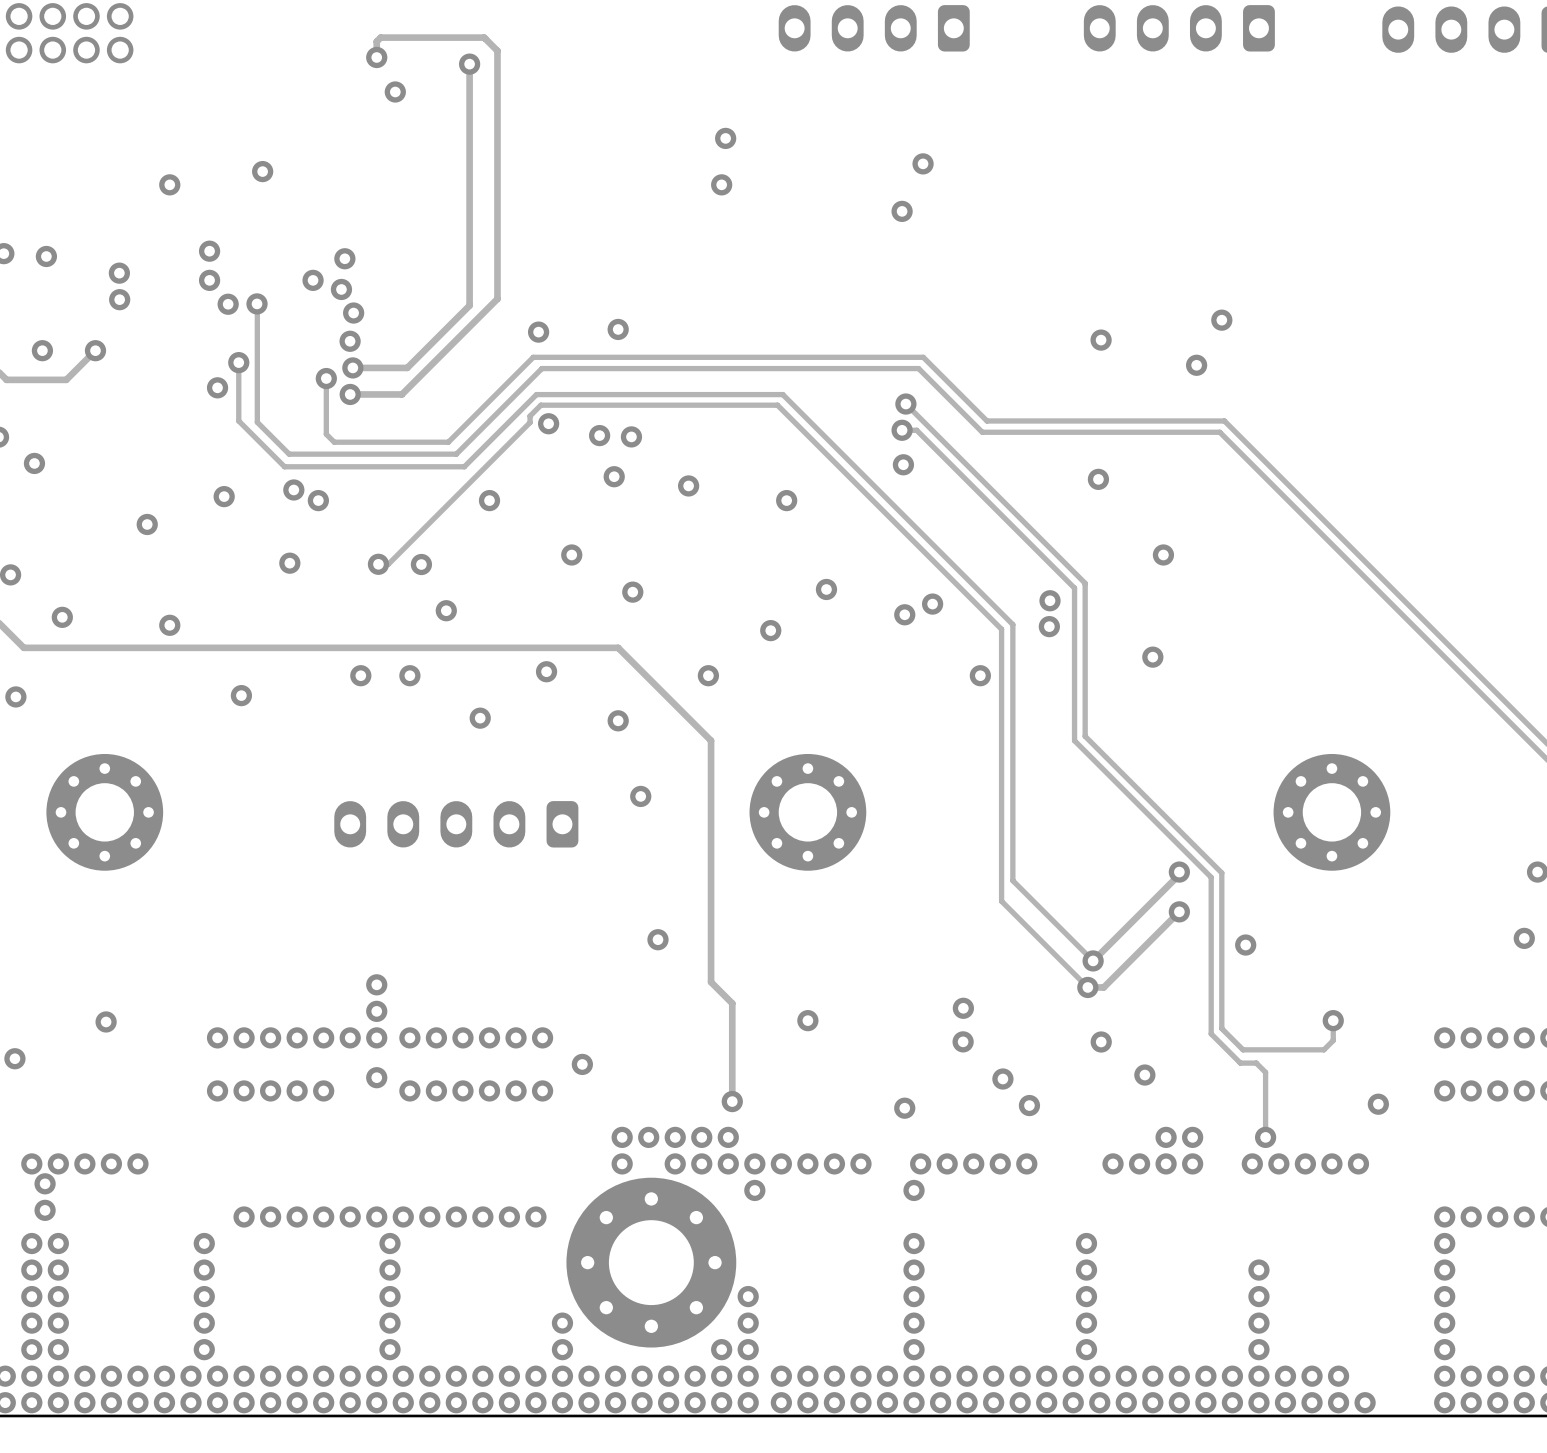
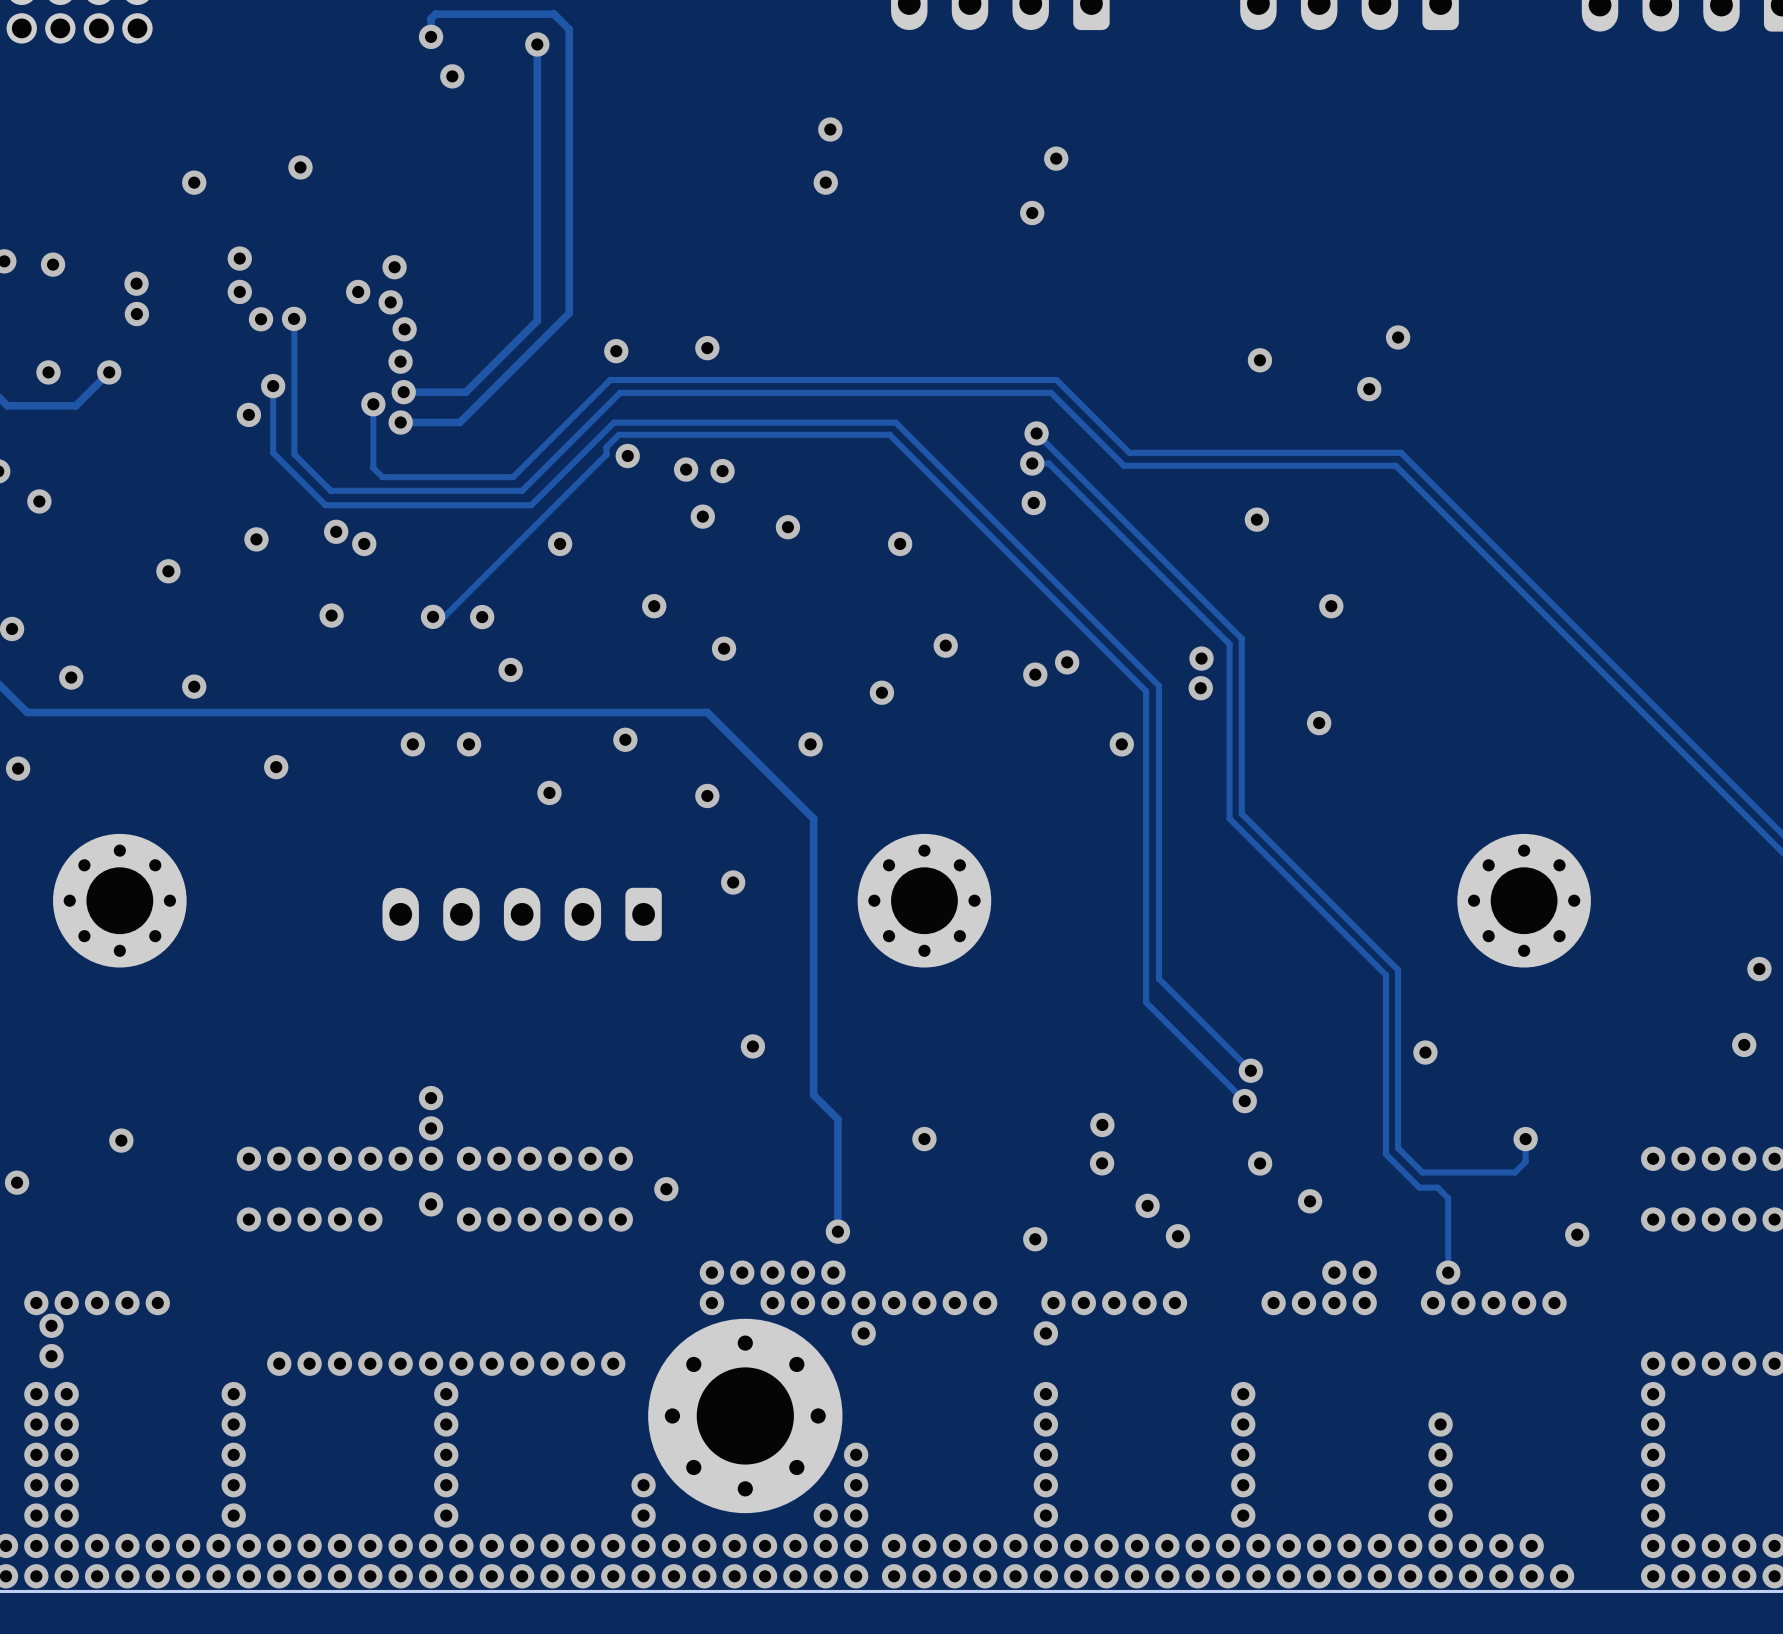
track: (1179, 872) (1179, 874) (1093, 960) -> none
via: (1179, 872) -> none
track: (1179, 911) (1103, 987) (1087, 987) -> none
via: (1179, 911) -> none

